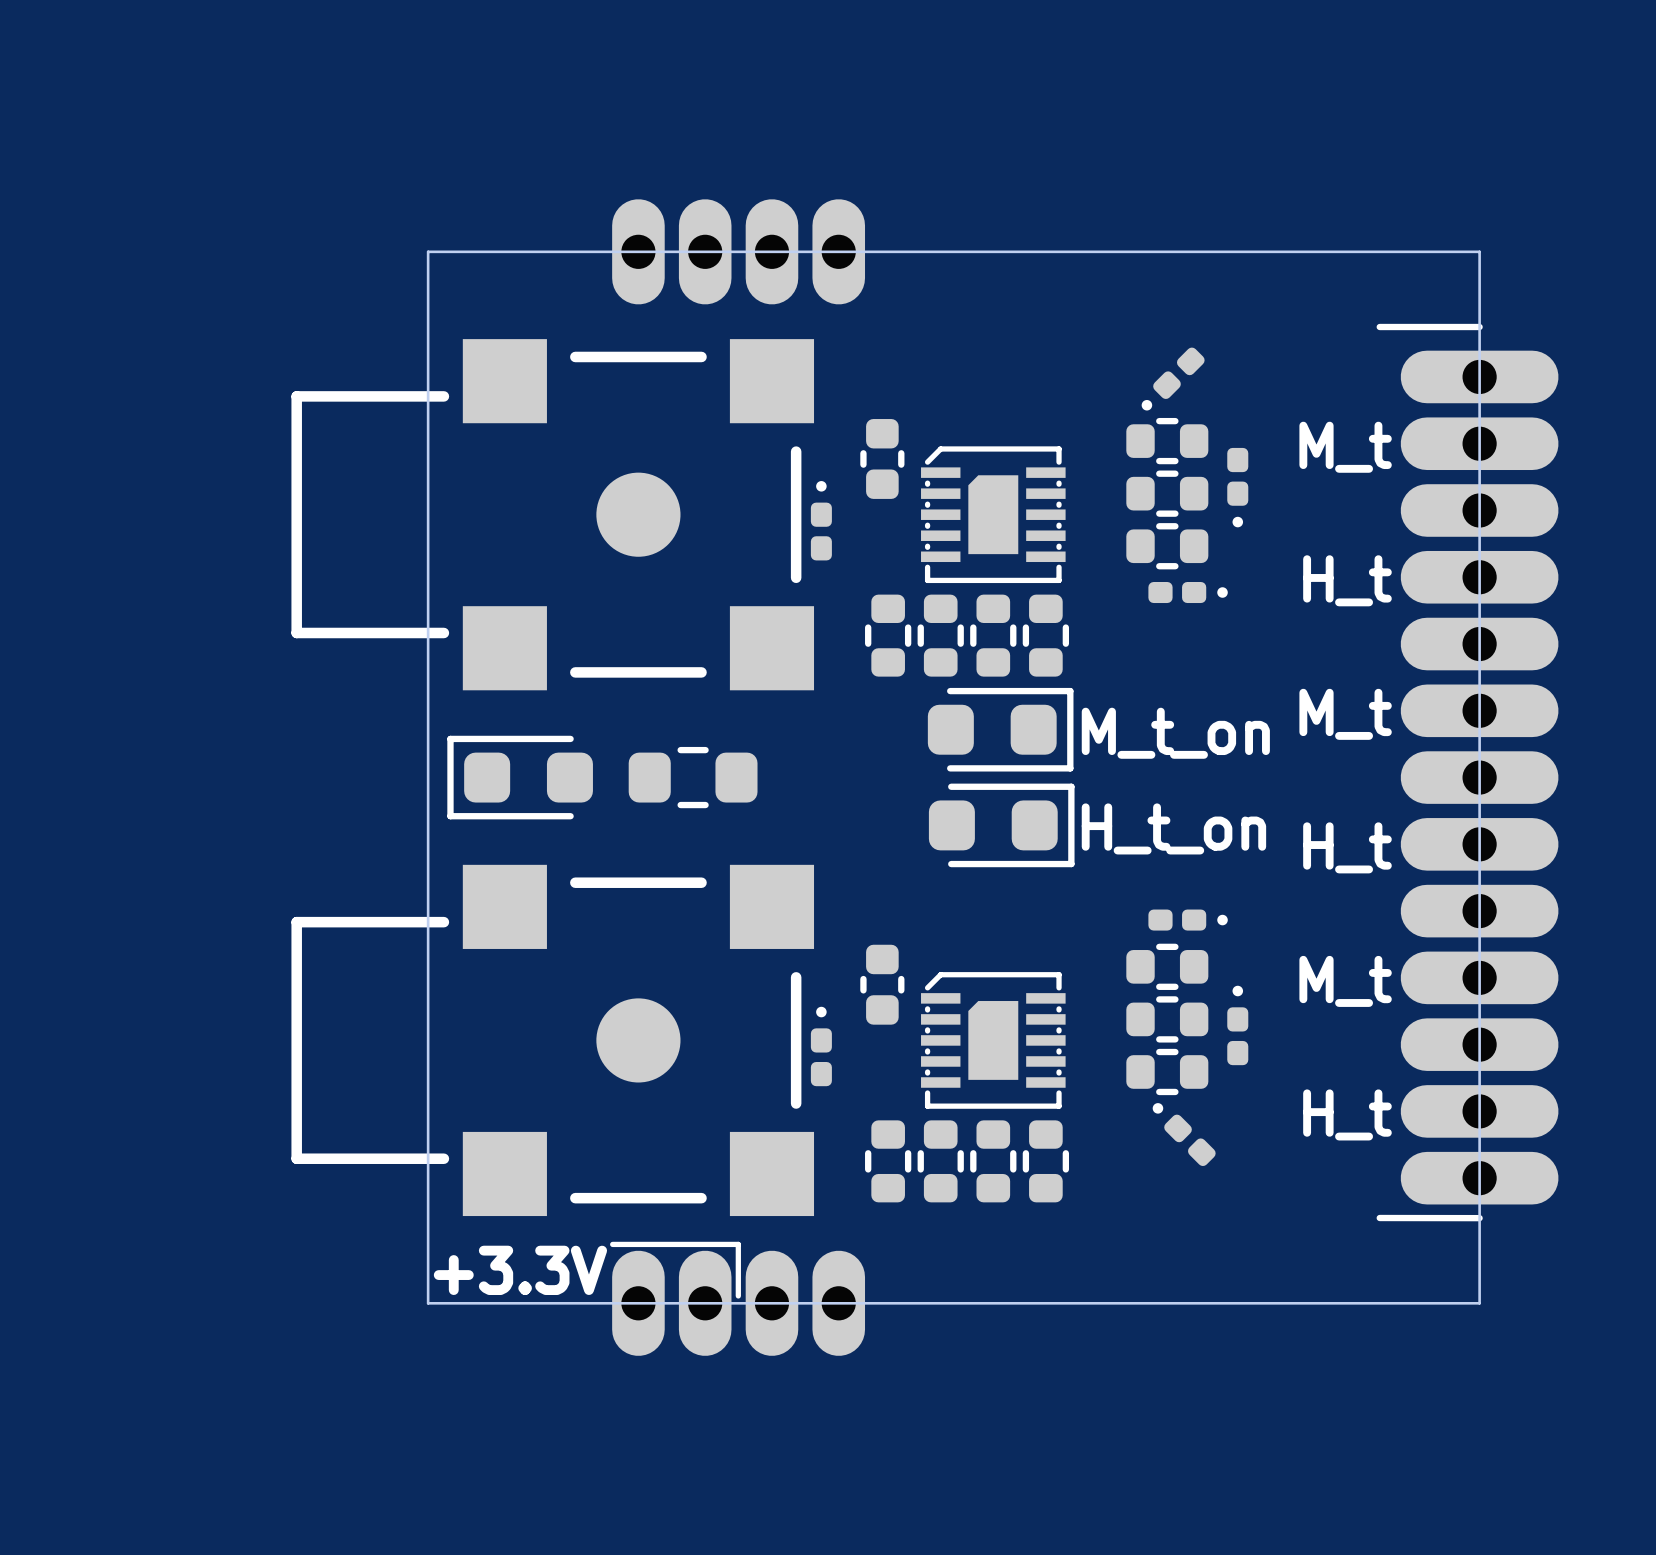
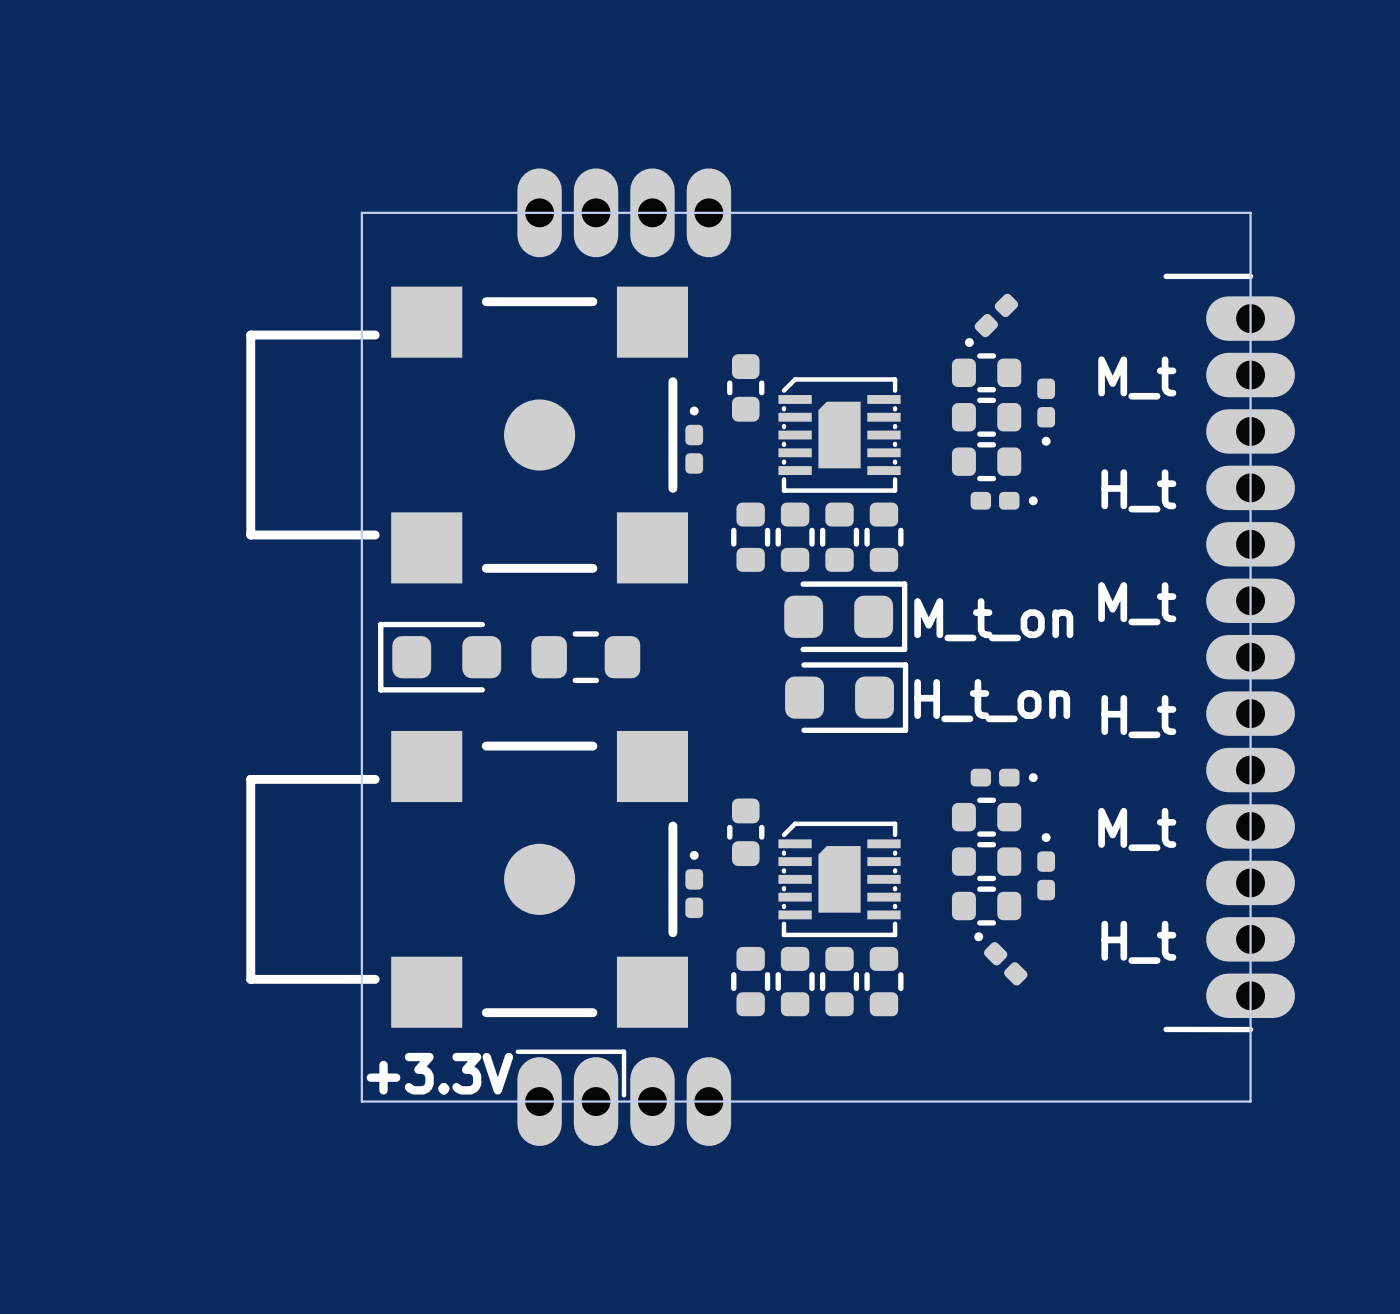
part footprint: [1376, 323, 1559, 1222] -> [1163, 273, 1295, 1033]

